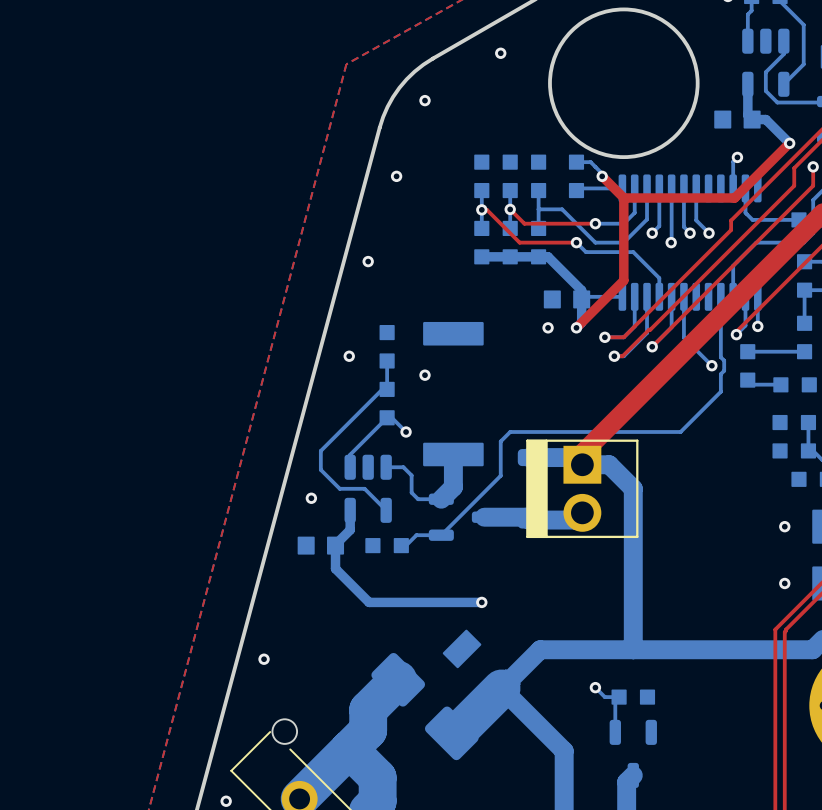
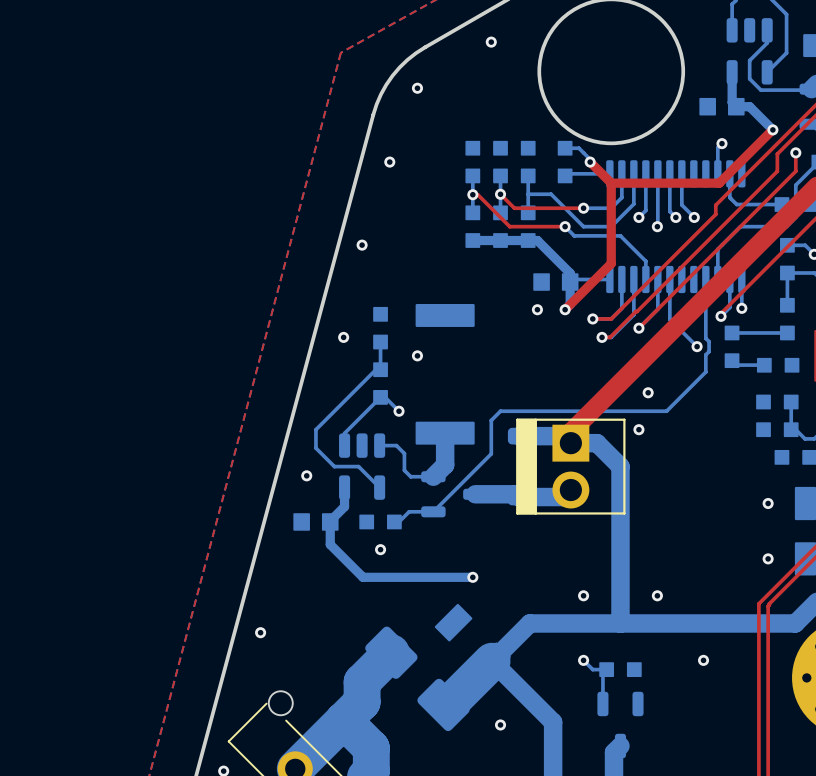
via: none -> (648, 392)
via: none -> (638, 429)
via: none -> (380, 549)
via: none -> (583, 595)
via: none -> (657, 595)
via: none -> (703, 660)
via: none -> (500, 724)

